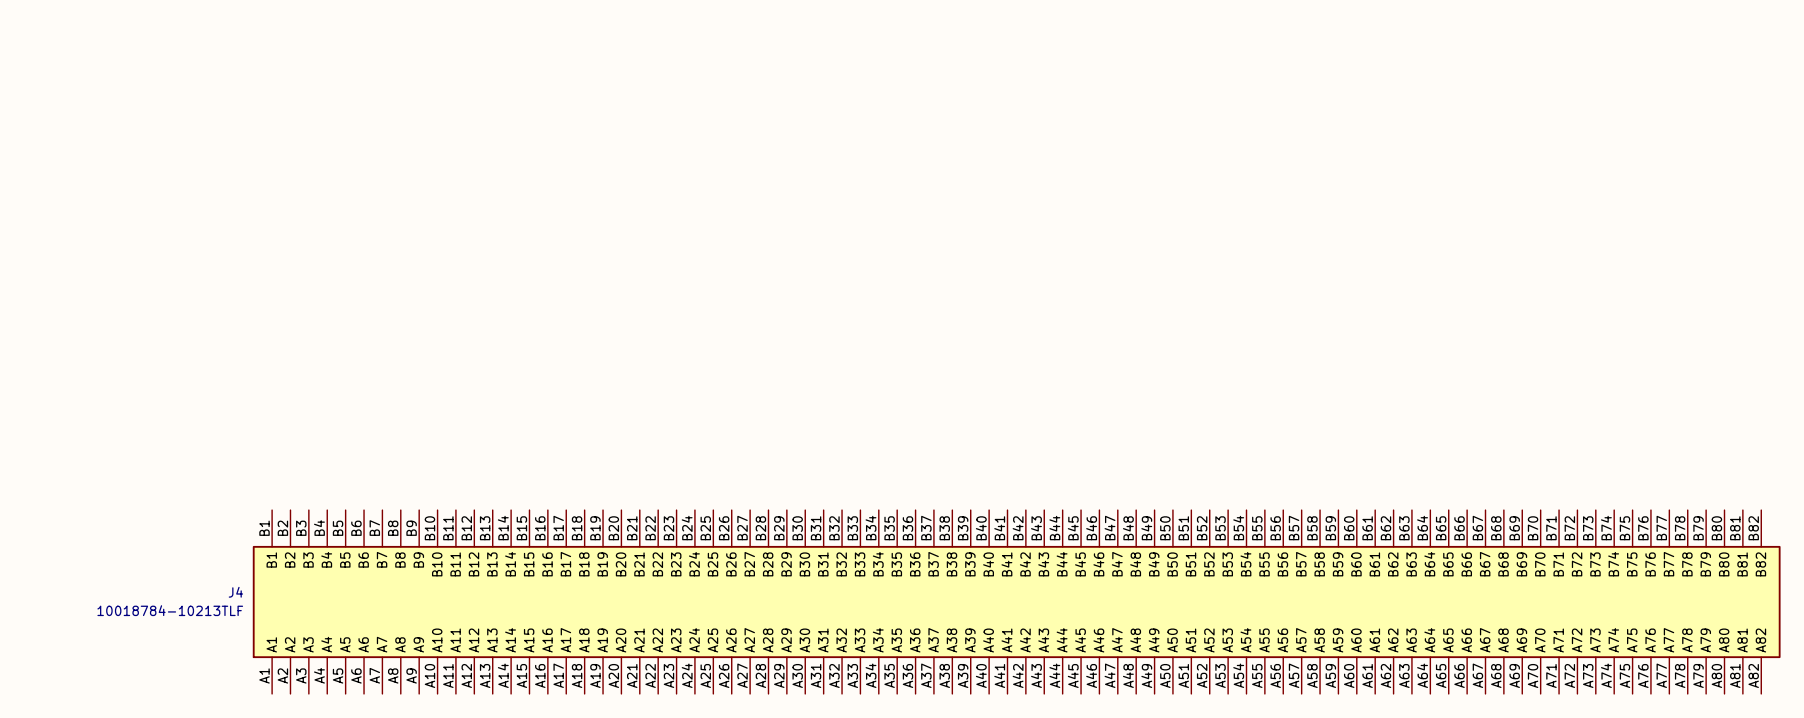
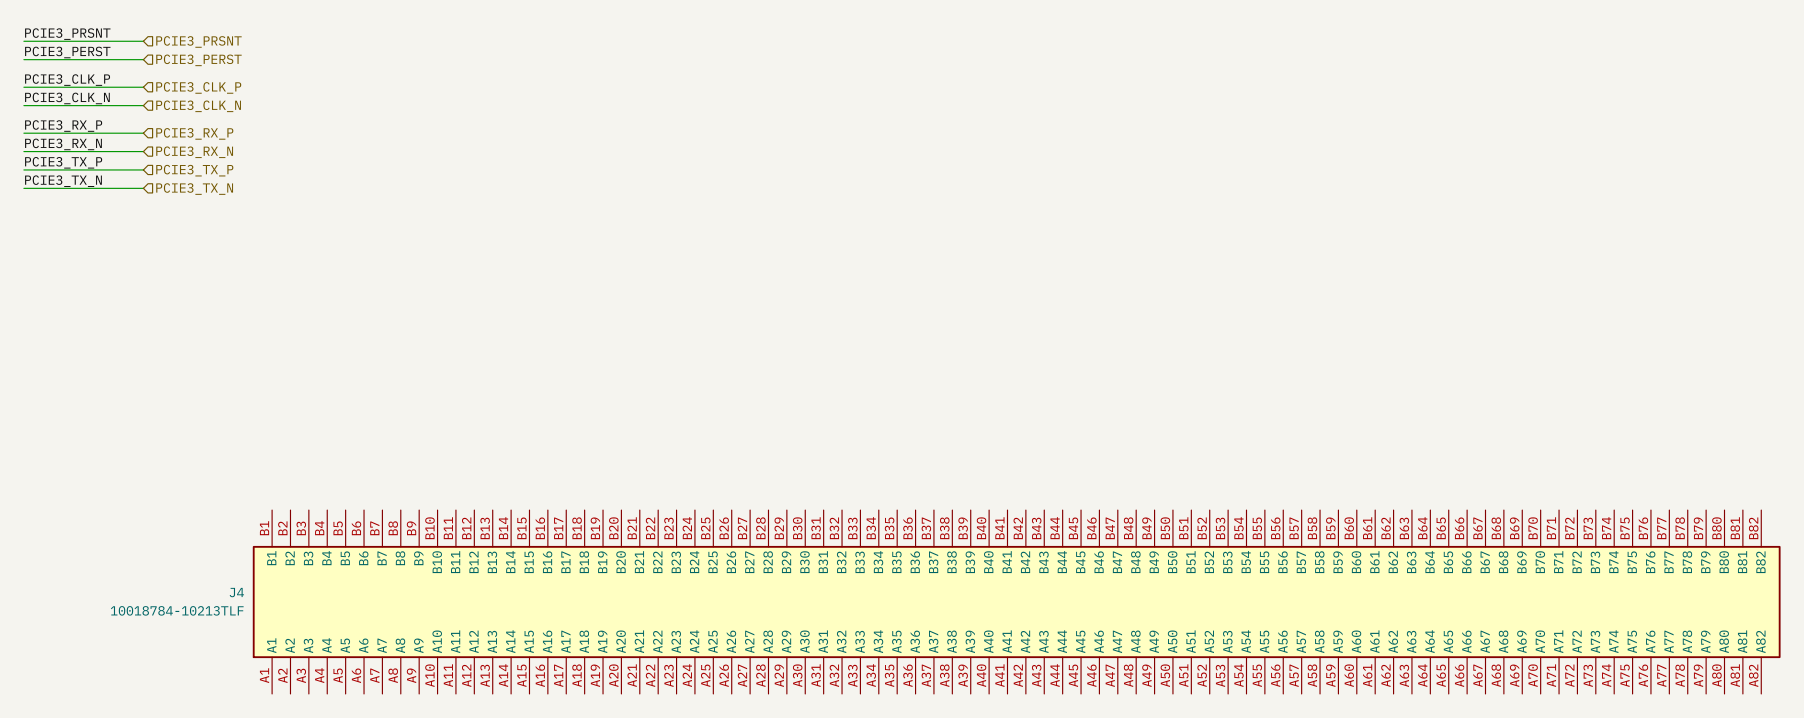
label: none -> PCIE3_PRSNT (67, 34)
wire: none -> (23, 41) (143, 41)
hierarchical label: none -> PCIE3_PRSNT (198, 41)
label: none -> PCIE3_PERST (67, 52)
wire: none -> (23, 59) (143, 59)
hierarchical label: none -> PCIE3_PERST (198, 60)
label: none -> PCIE3_CLK_P (67, 80)
wire: none -> (23, 87) (143, 87)
hierarchical label: none -> PCIE3_CLK_P (198, 87)
label: none -> PCIE3_CLK_N (67, 98)
wire: none -> (23, 105) (143, 105)
hierarchical label: none -> PCIE3_CLK_N (198, 106)
label: none -> PCIE3_RX_P (63, 126)
wire: none -> (23, 133) (143, 133)
hierarchical label: none -> PCIE3_RX_P (194, 133)
label: none -> PCIE3_RX_N (63, 144)
wire: none -> (23, 151) (143, 151)
hierarchical label: none -> PCIE3_RX_N (194, 152)
label: none -> PCIE3_TX_P (63, 162)
wire: none -> (23, 169) (143, 169)
hierarchical label: none -> PCIE3_TX_P (194, 170)
label: none -> PCIE3_TX_N (63, 181)
wire: none -> (23, 188) (143, 188)
hierarchical label: none -> PCIE3_TX_N (194, 189)

